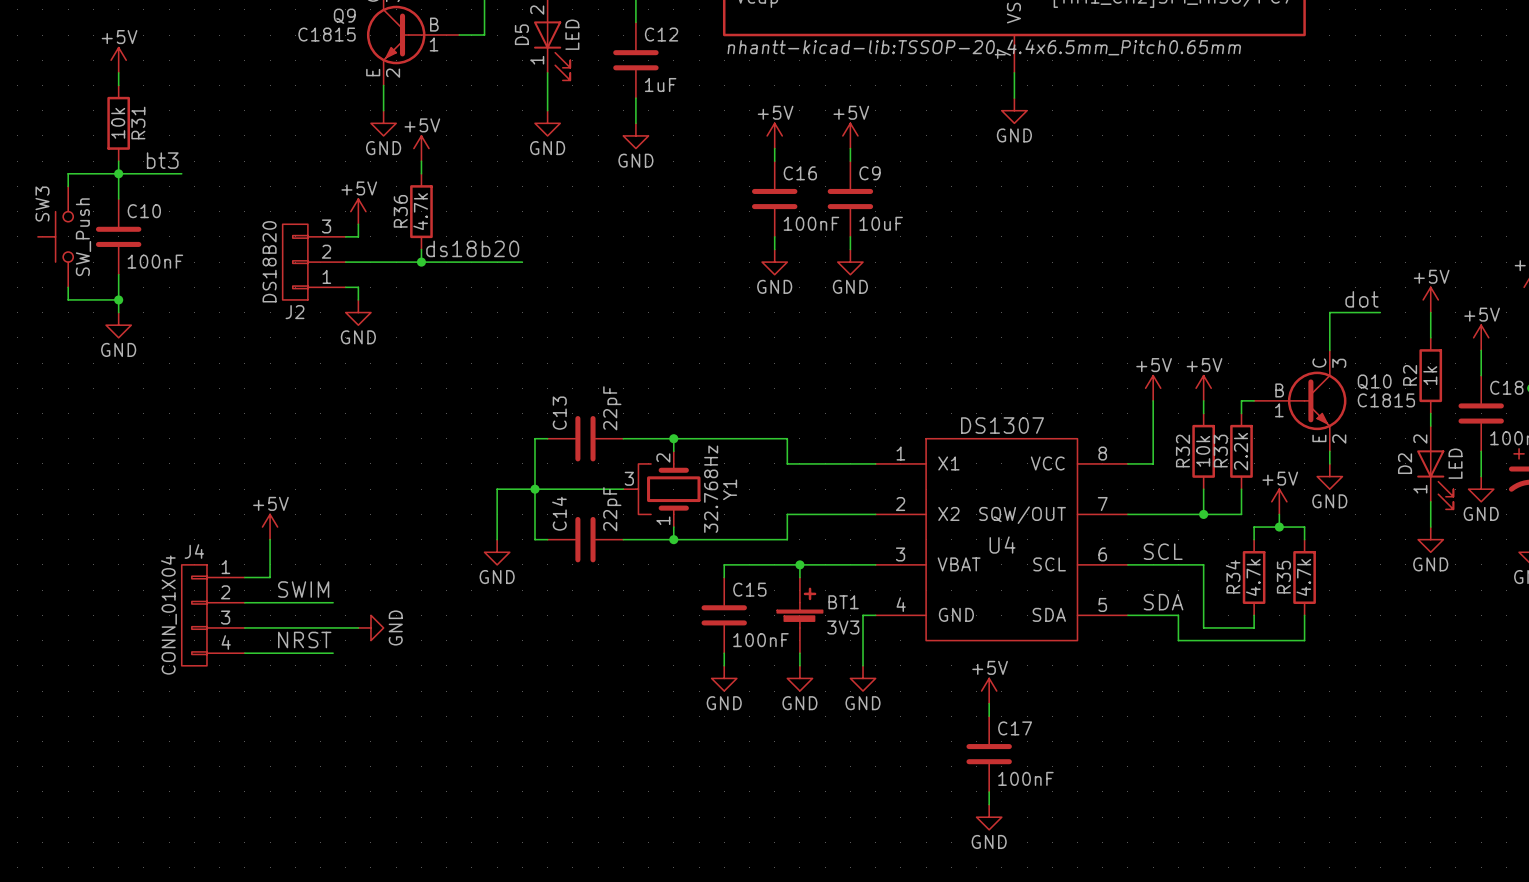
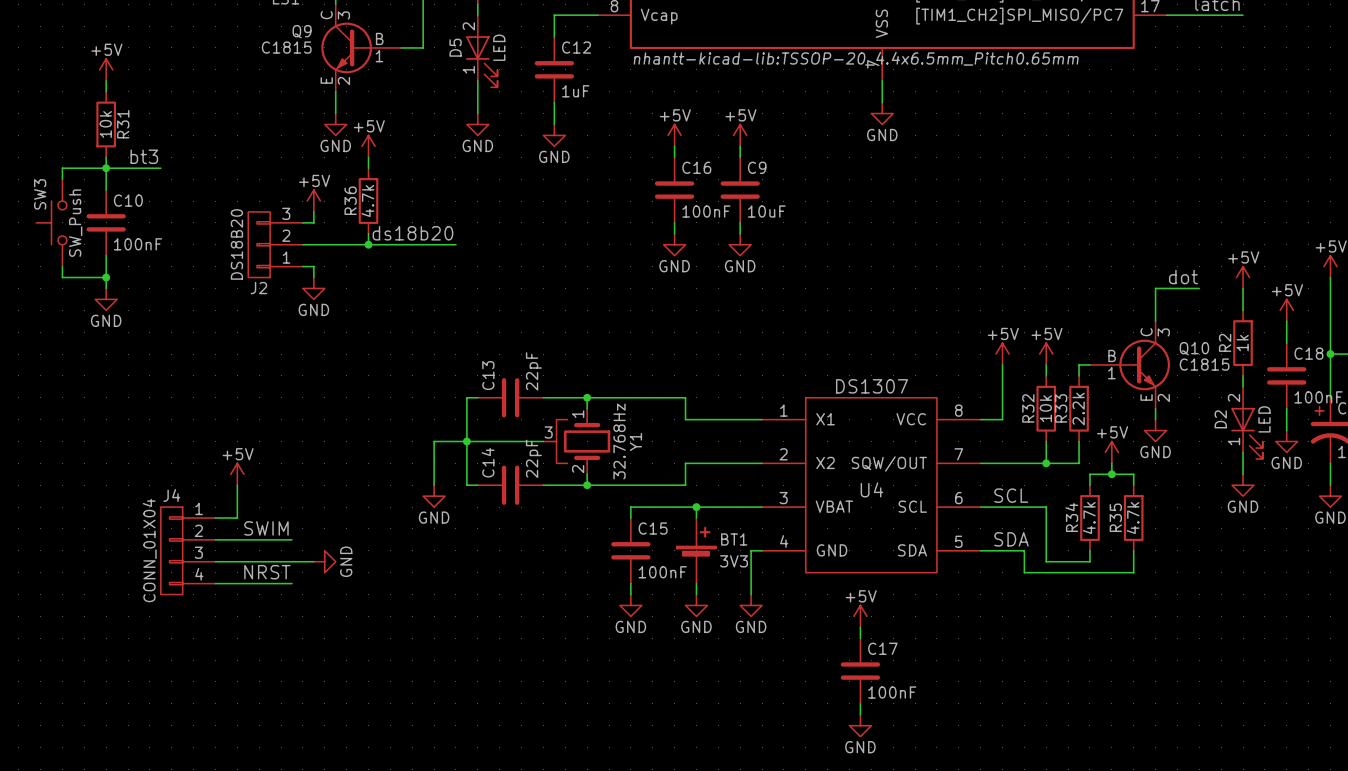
Y1 flip: as is (668, 489) -> up-down (582, 441)

